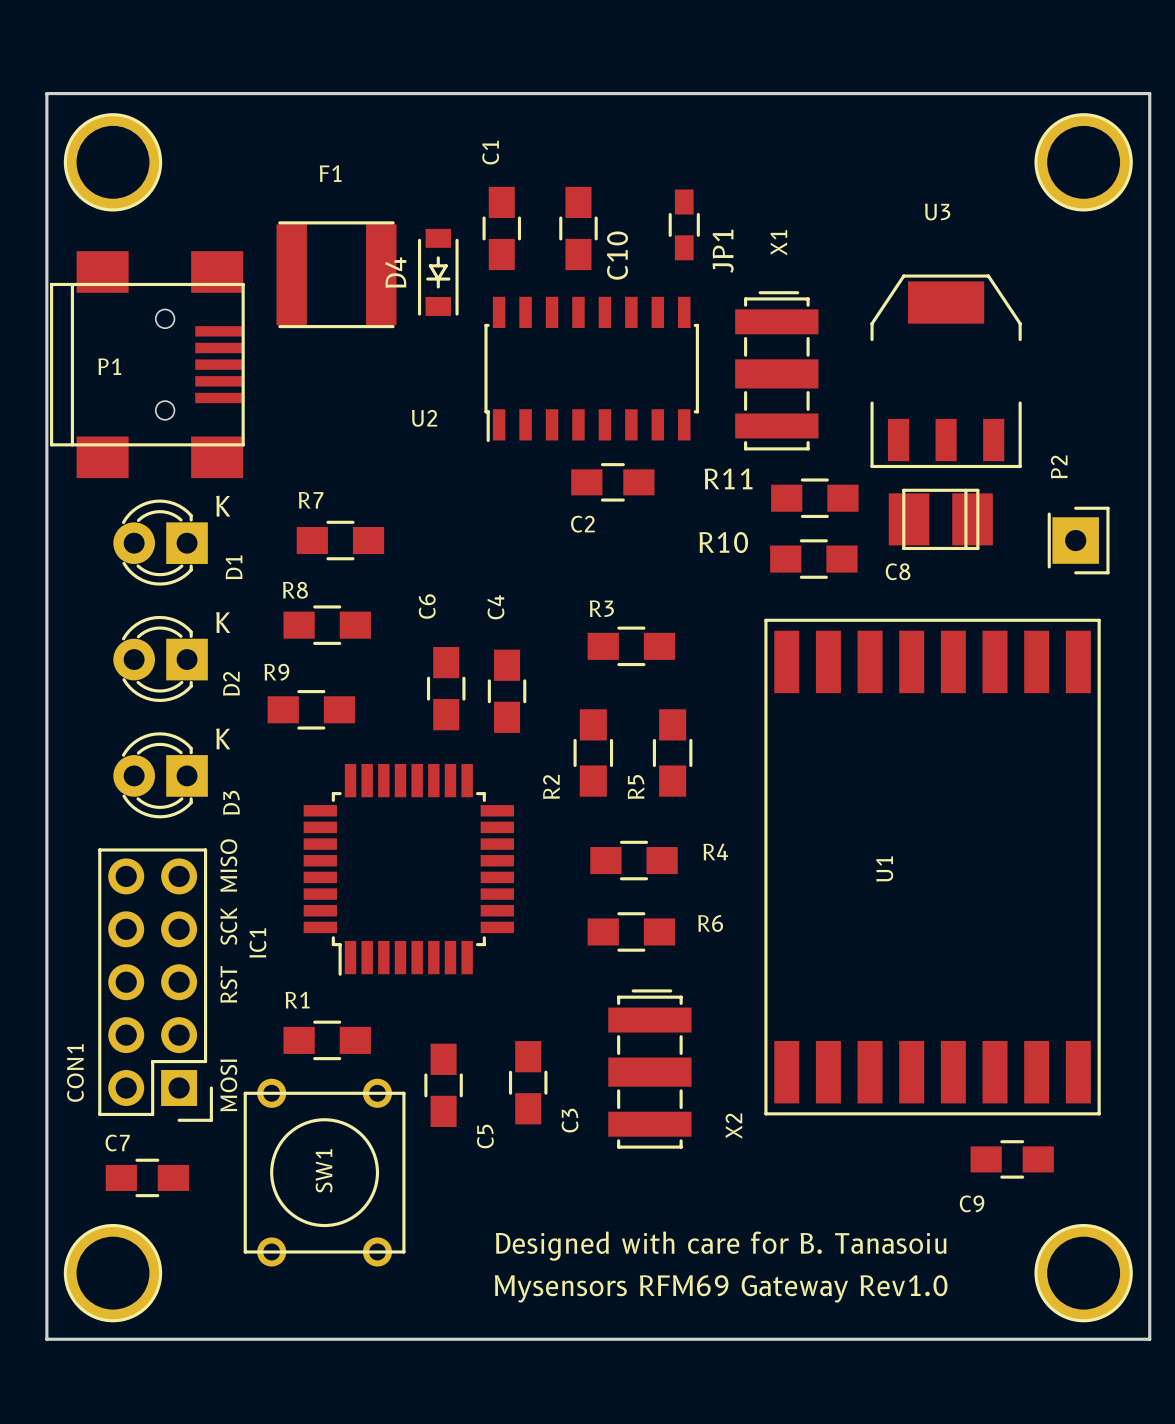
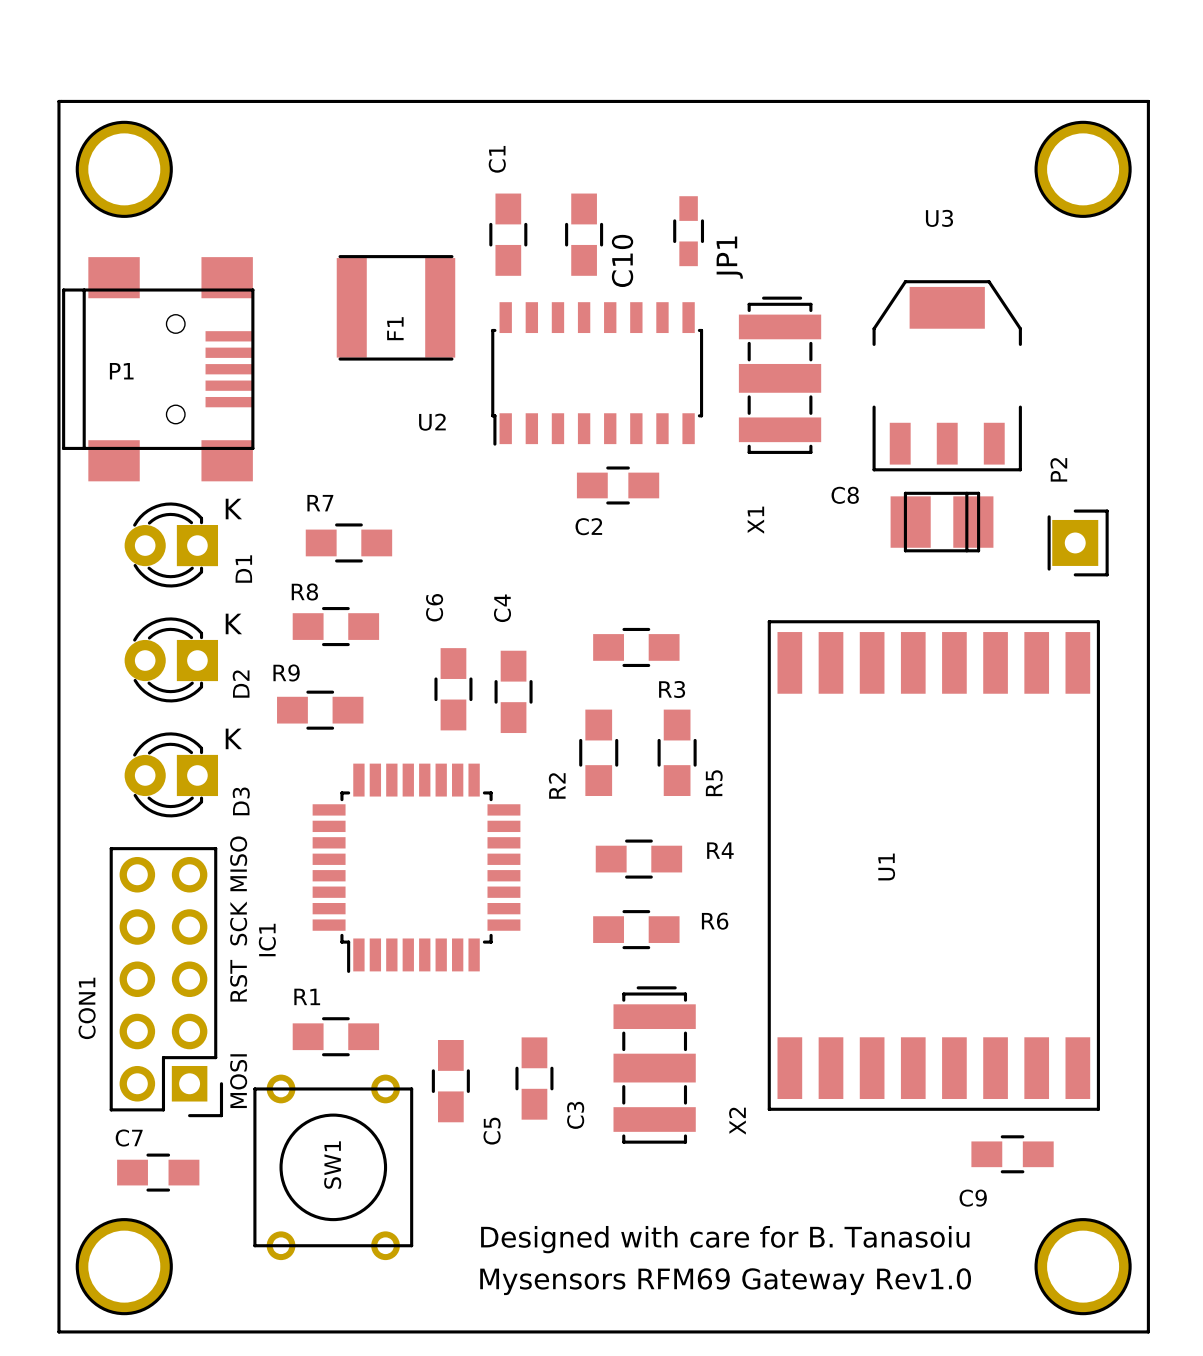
F1 name rotation: 0° (330, 173) -> 90° counterclockwise (395, 328)
F1 name position: F1 (330, 173) -> F1 (395, 328)
X1 name position: X1 (778, 242) -> X1 (755, 520)
D4: (438, 272) -> none
F1 position: (336, 274) -> (395, 307)
R11: (814, 498) -> none
R10: (813, 559) -> none
C8 name position: C8 (898, 571) -> C8 (845, 495)
R3 name position: R3 (601, 608) -> R3 (672, 689)
R5 name position: R5 (636, 787) -> R5 (714, 783)
CON1 name position: CON1 (75, 1073) -> CON1 (87, 1008)

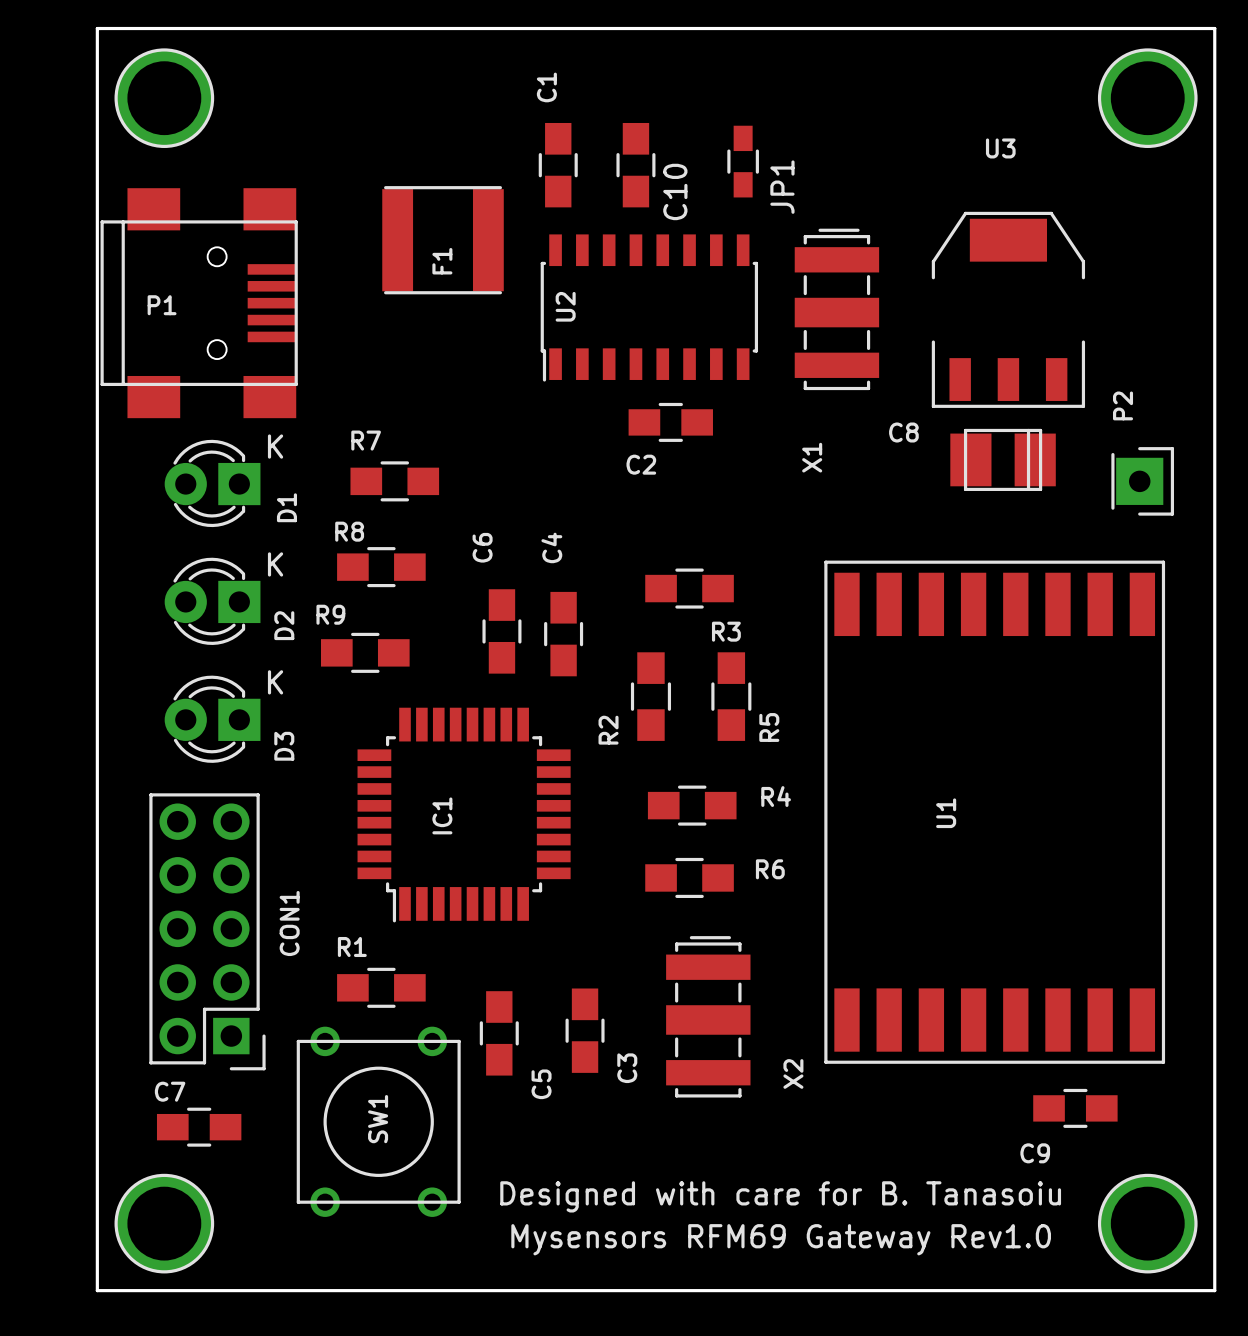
U2 name rotation: 0° (432, 422) -> 90° counterclockwise (565, 306)
U2 name position: U2 (432, 422) -> U2 (565, 306)
text: MISO (238, 863) -> none
text: SCK (238, 923) -> none
IC1 name position: IC1 (267, 940) -> IC1 (442, 815)
text: RST (238, 980) -> none
CON1 name position: CON1 (87, 1008) -> CON1 (289, 923)
text: MOSI (238, 1081) -> none

